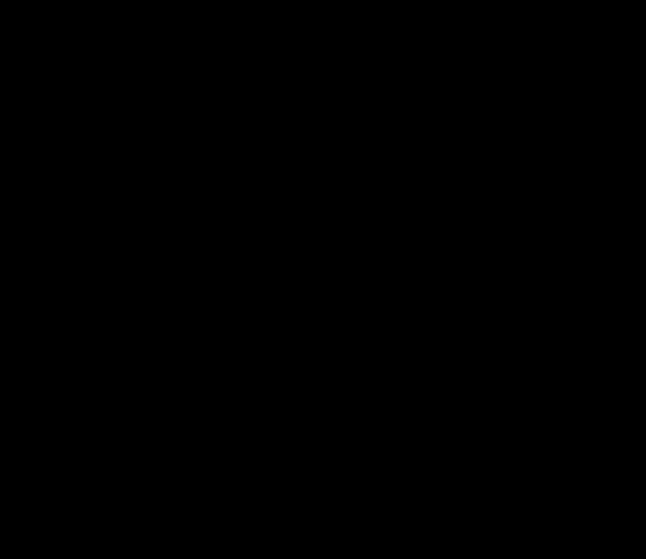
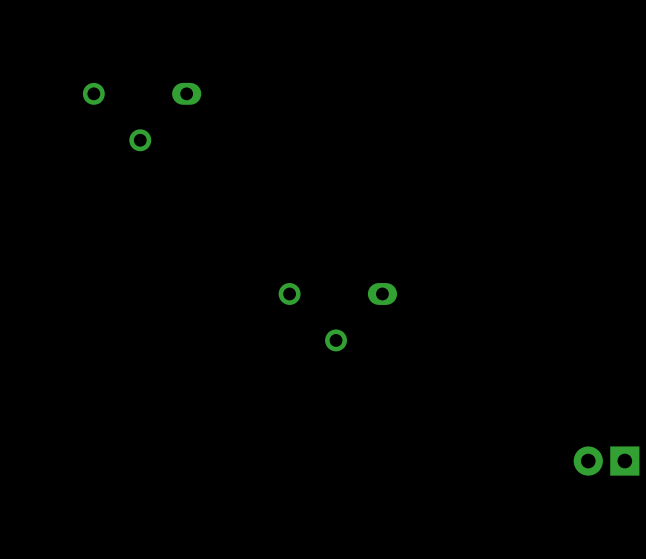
part: none -> (142, 117)
part: none -> (337, 317)
part: none -> (606, 461)

